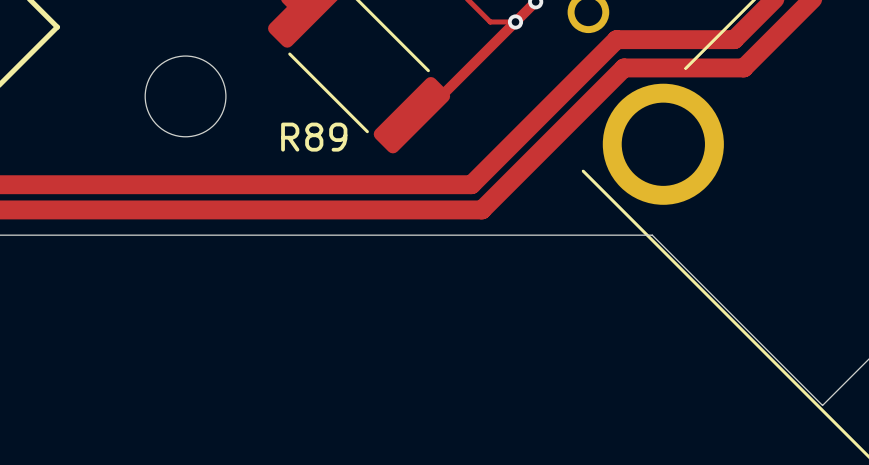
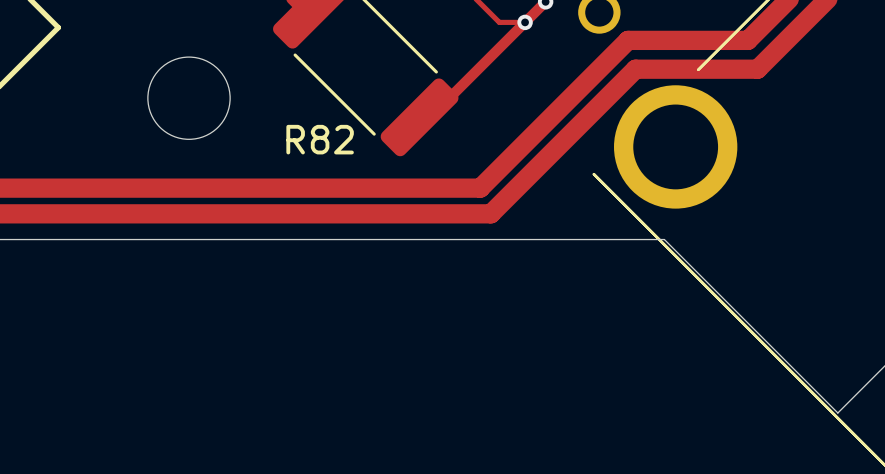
R89 name: R89 (314, 137) -> R82 (320, 139)

